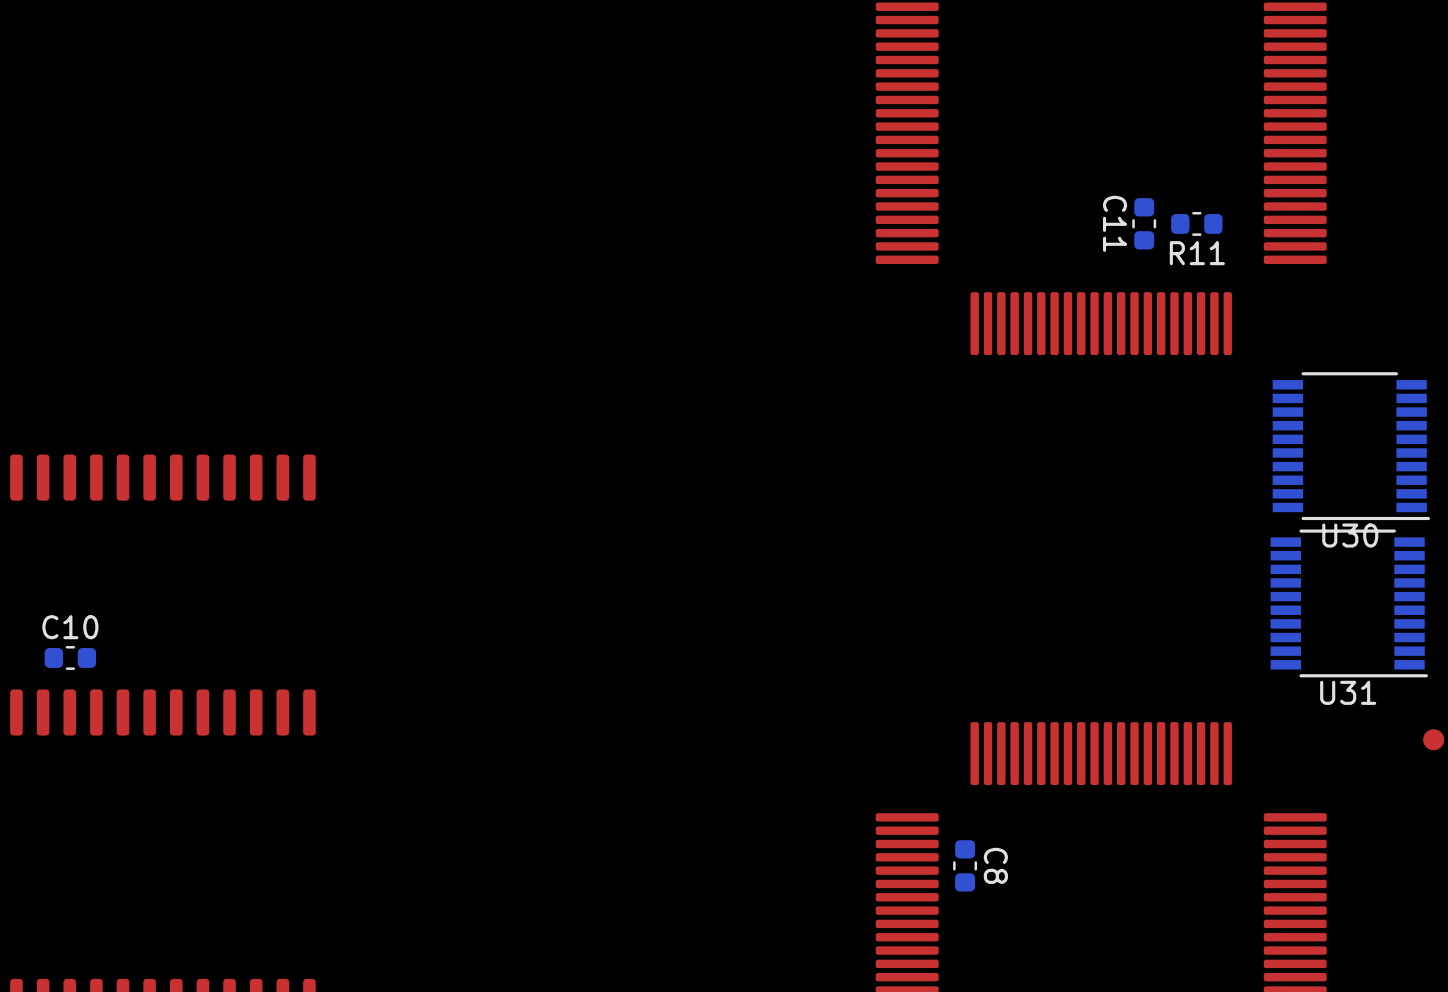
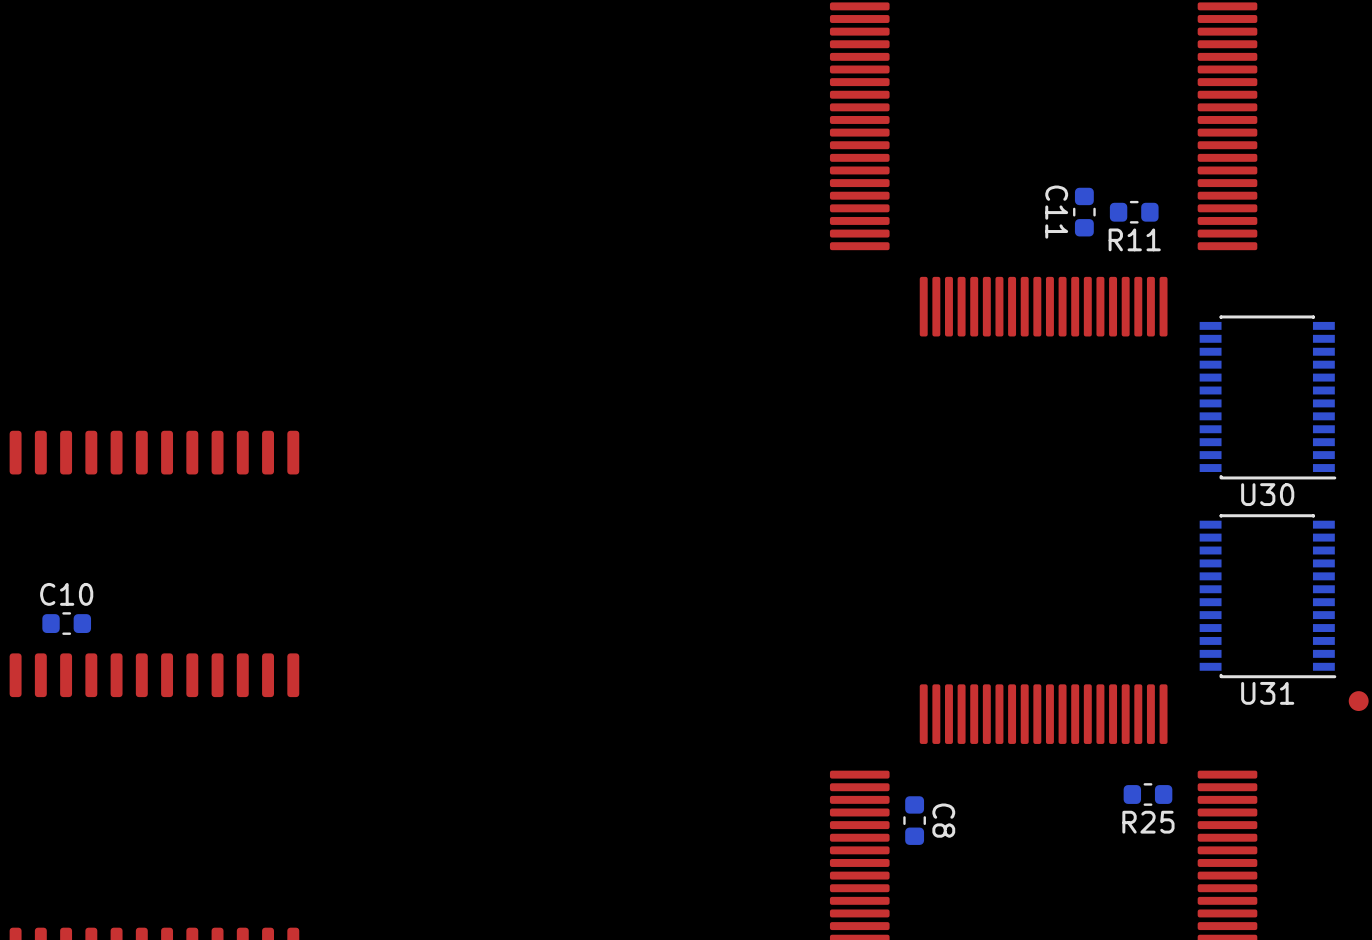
U30 footprint: [1272, 372, 1430, 521] -> [1199, 315, 1337, 480]
U31 footprint: [1270, 529, 1428, 678] -> [1199, 514, 1337, 679]
R25: none -> (1147, 794)

